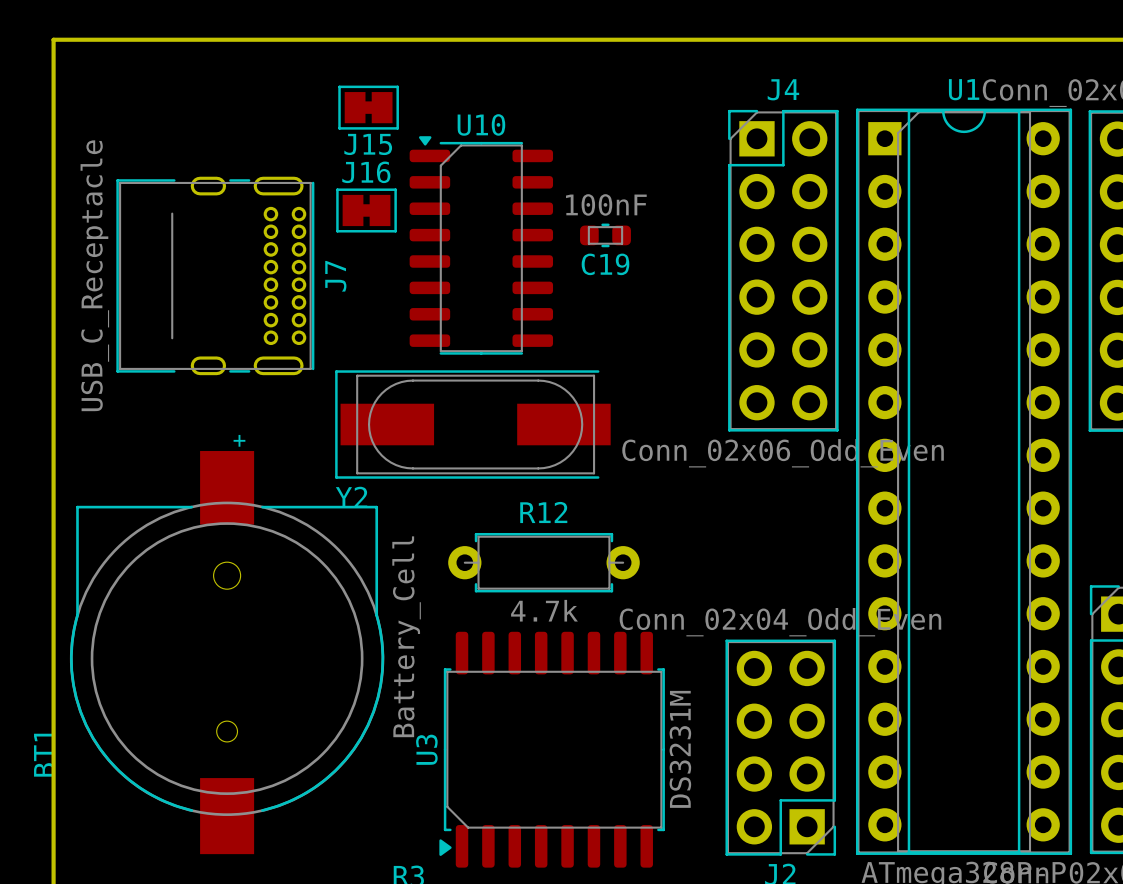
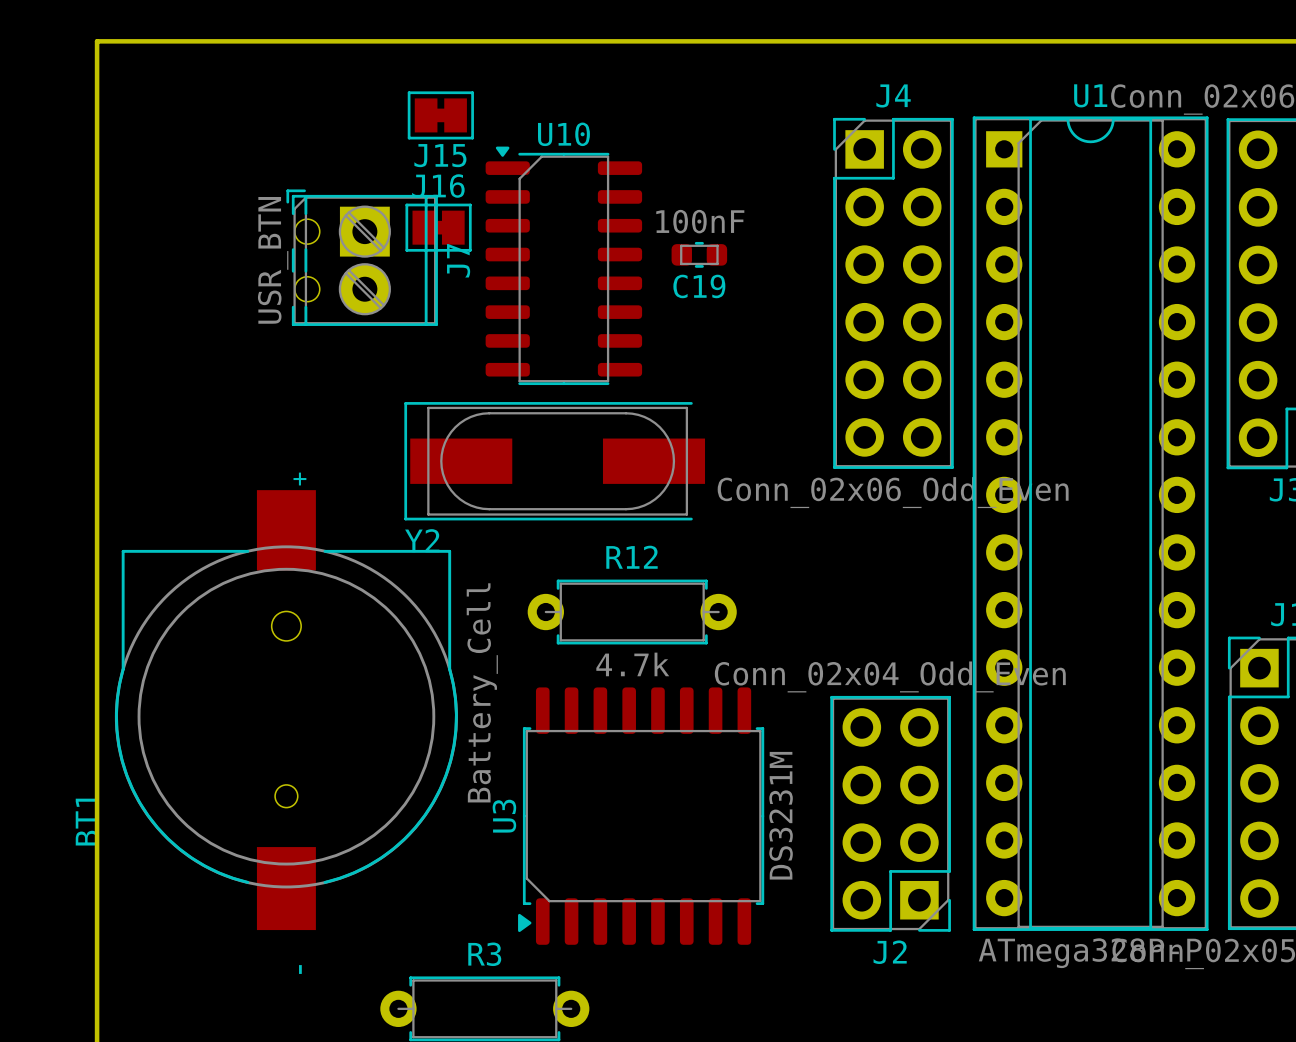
J7 footprint: [116, 176, 315, 376] -> [286, 189, 438, 326]
J7 value: USB_C_Receptacle (94, 275) -> USR_BTN (273, 260)

